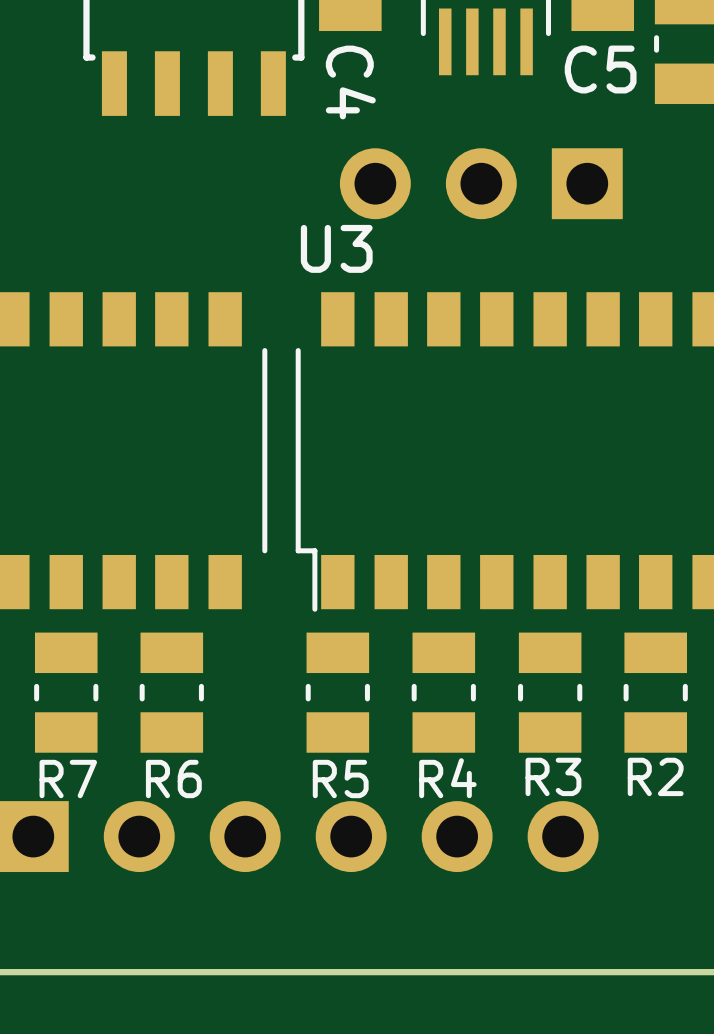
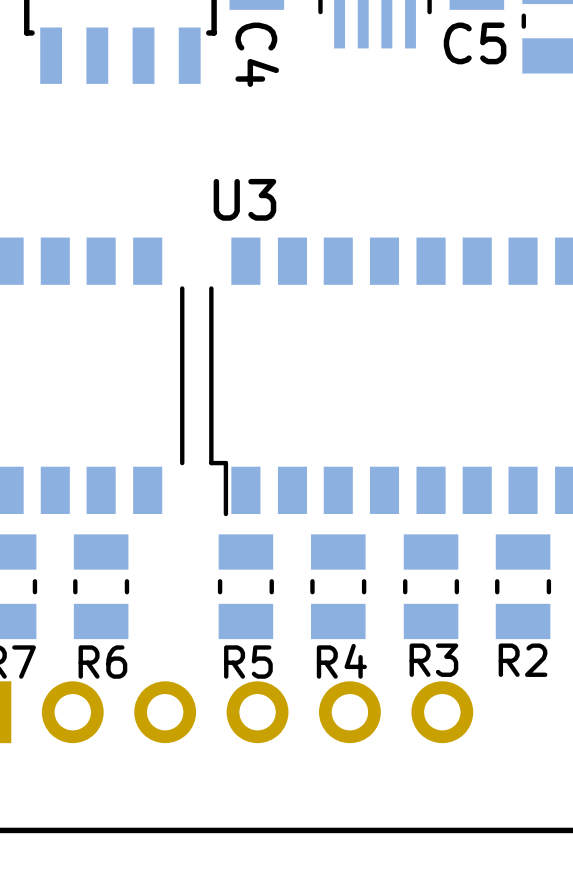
part: (481, 183) -> none

